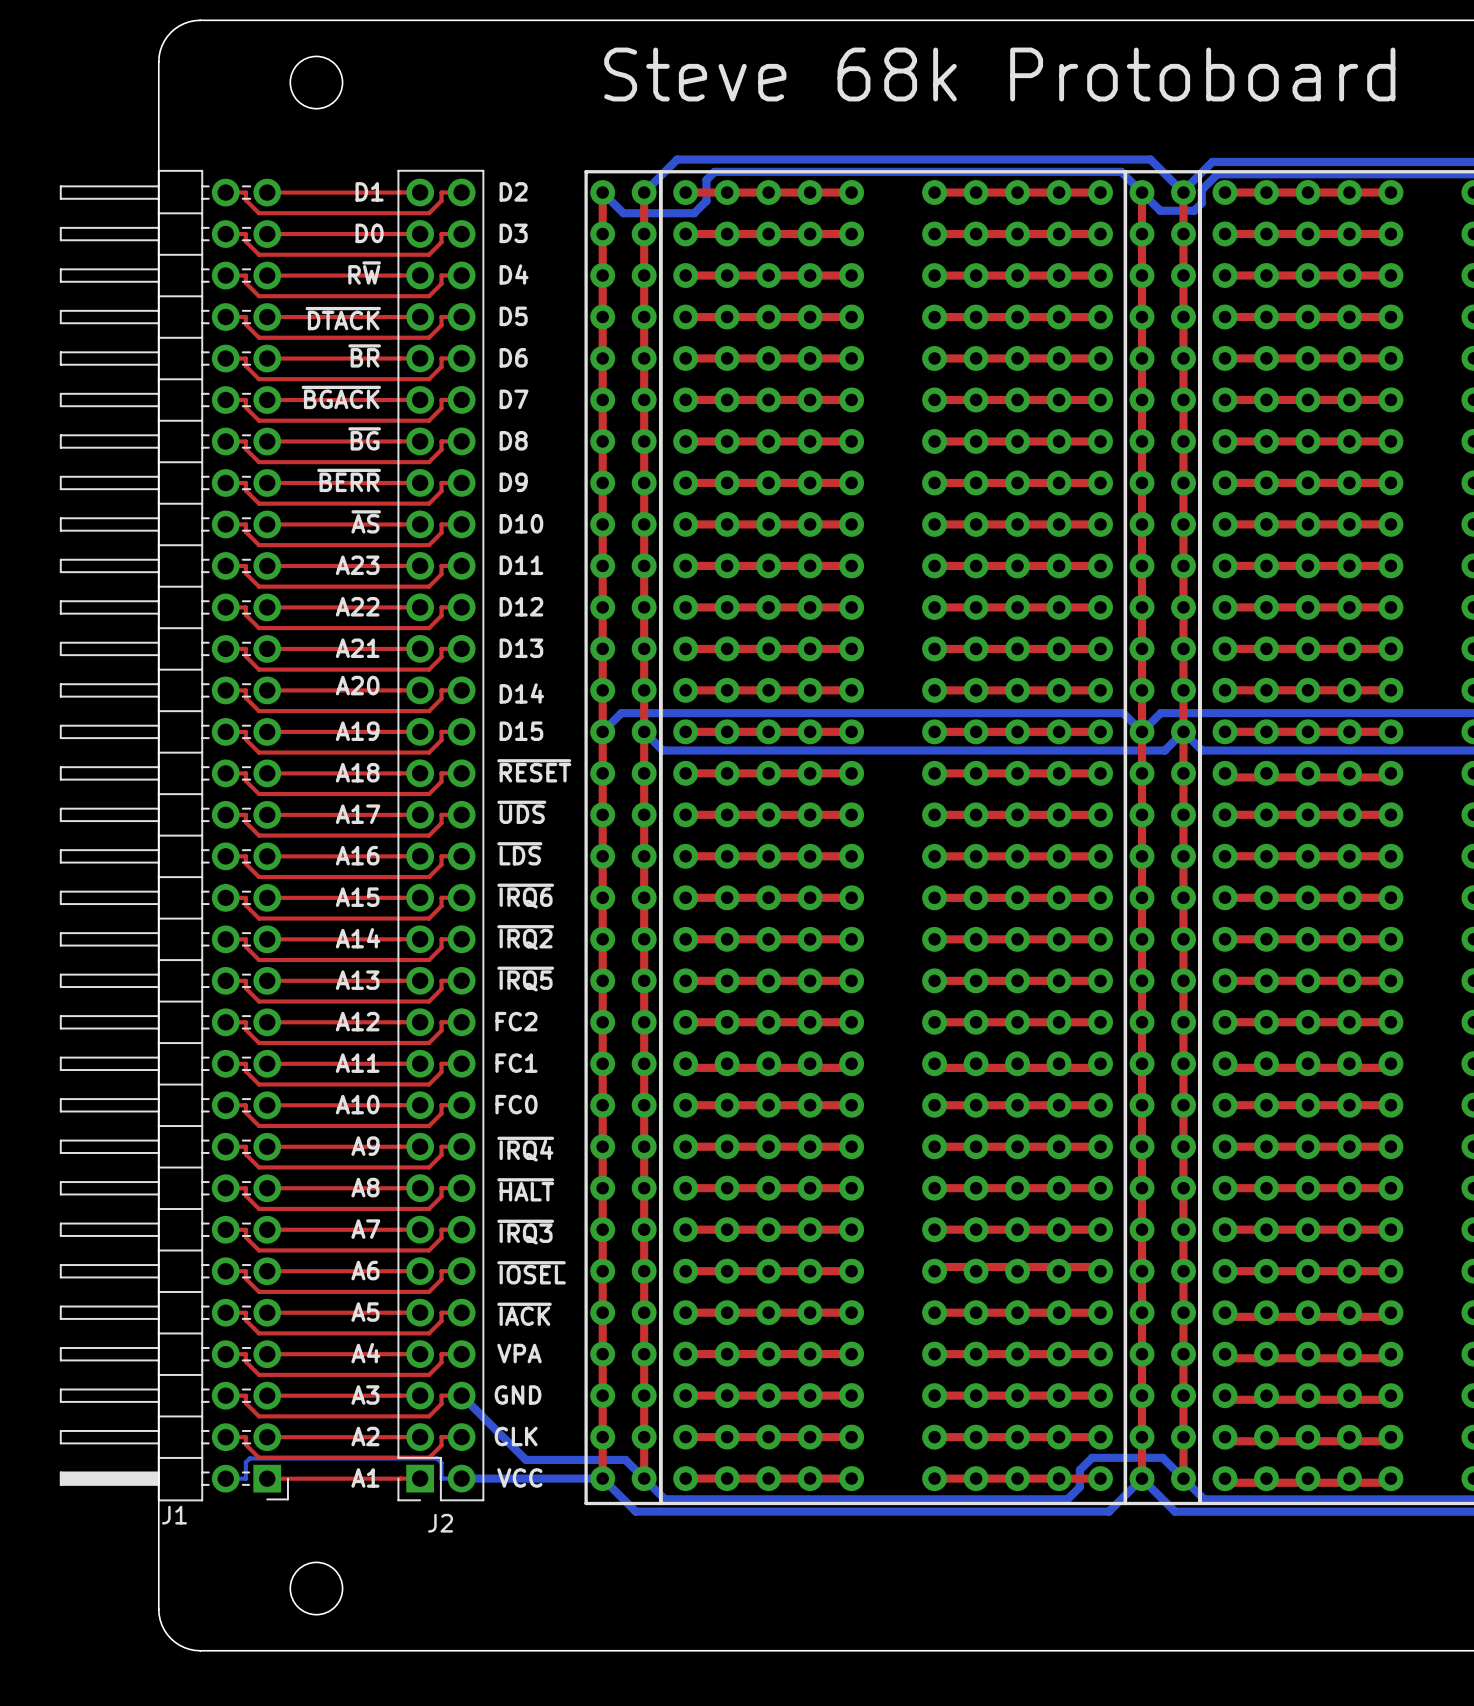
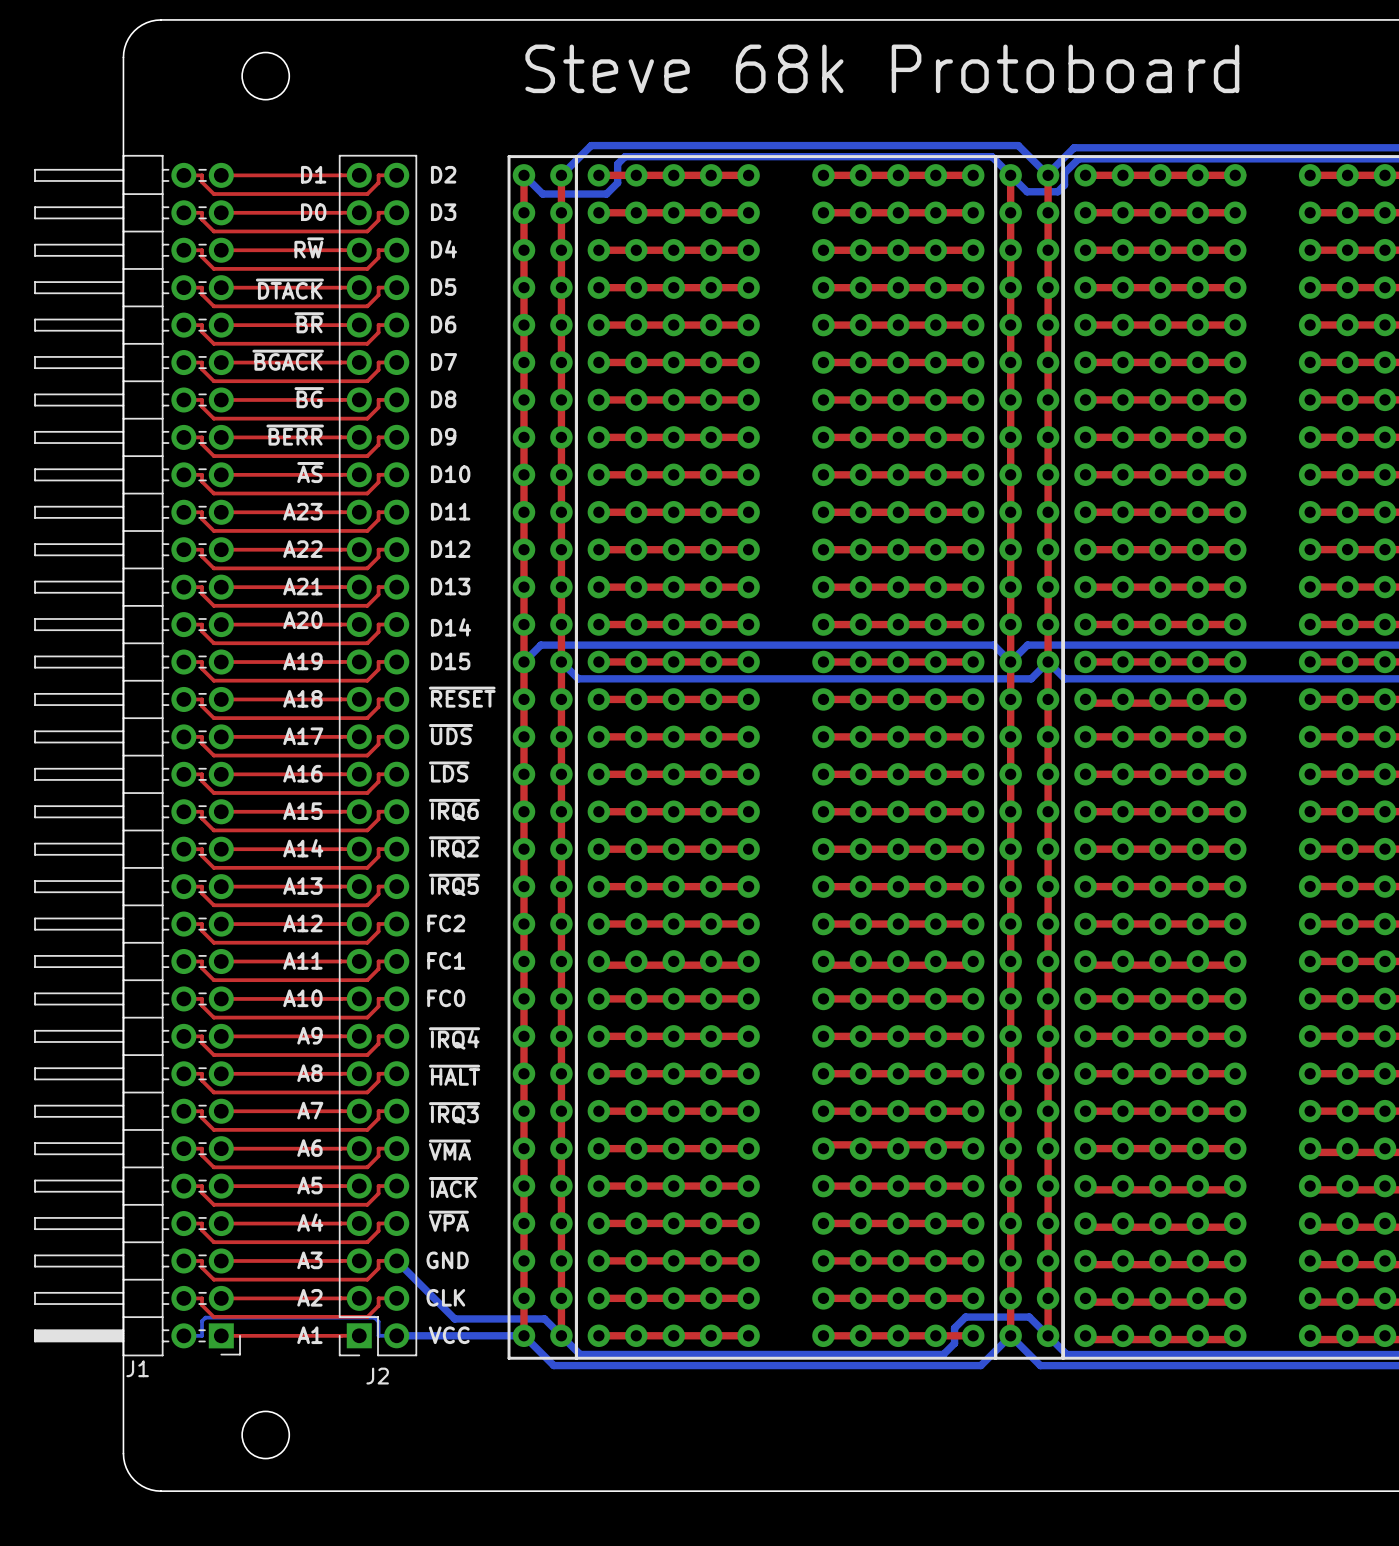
text: ~{IOSEL} (531, 1272) -> ~{VMA} (449, 1150)
text: VPA (519, 1353) -> ~{VPA} (448, 1221)

